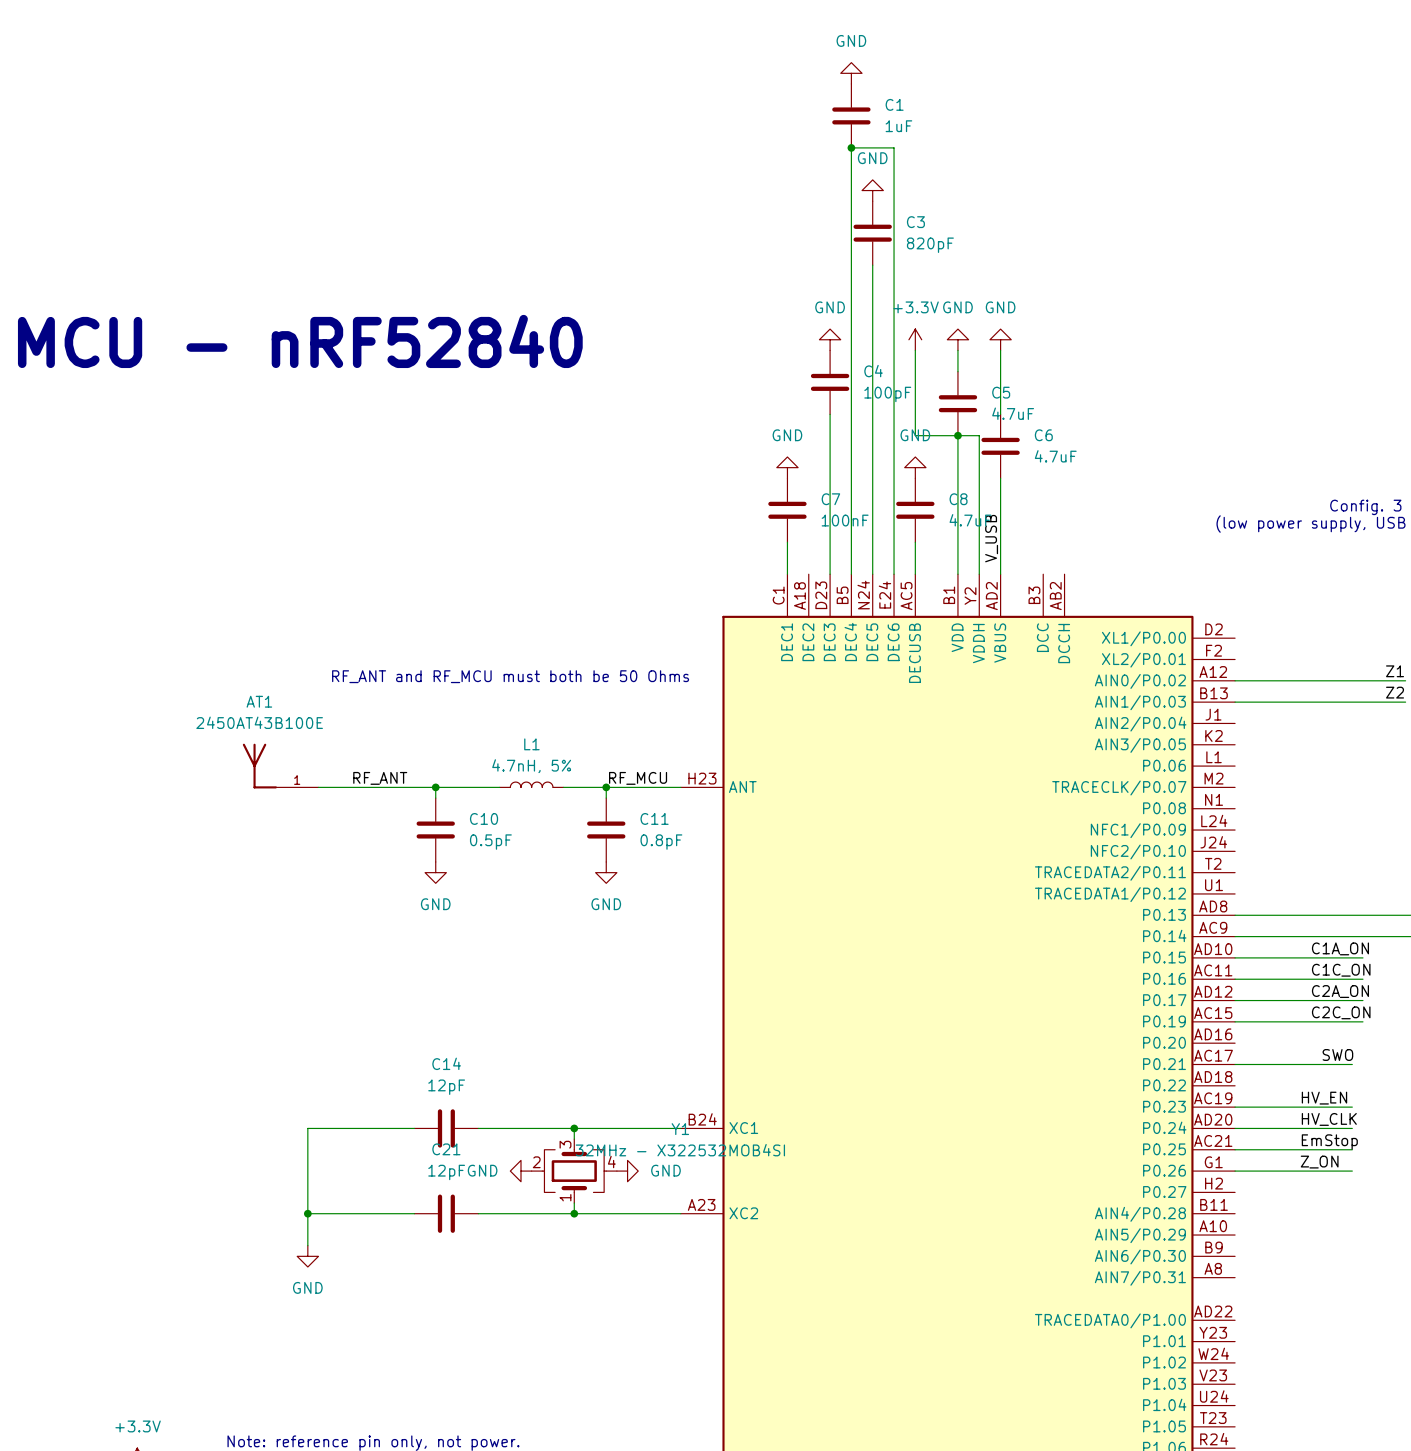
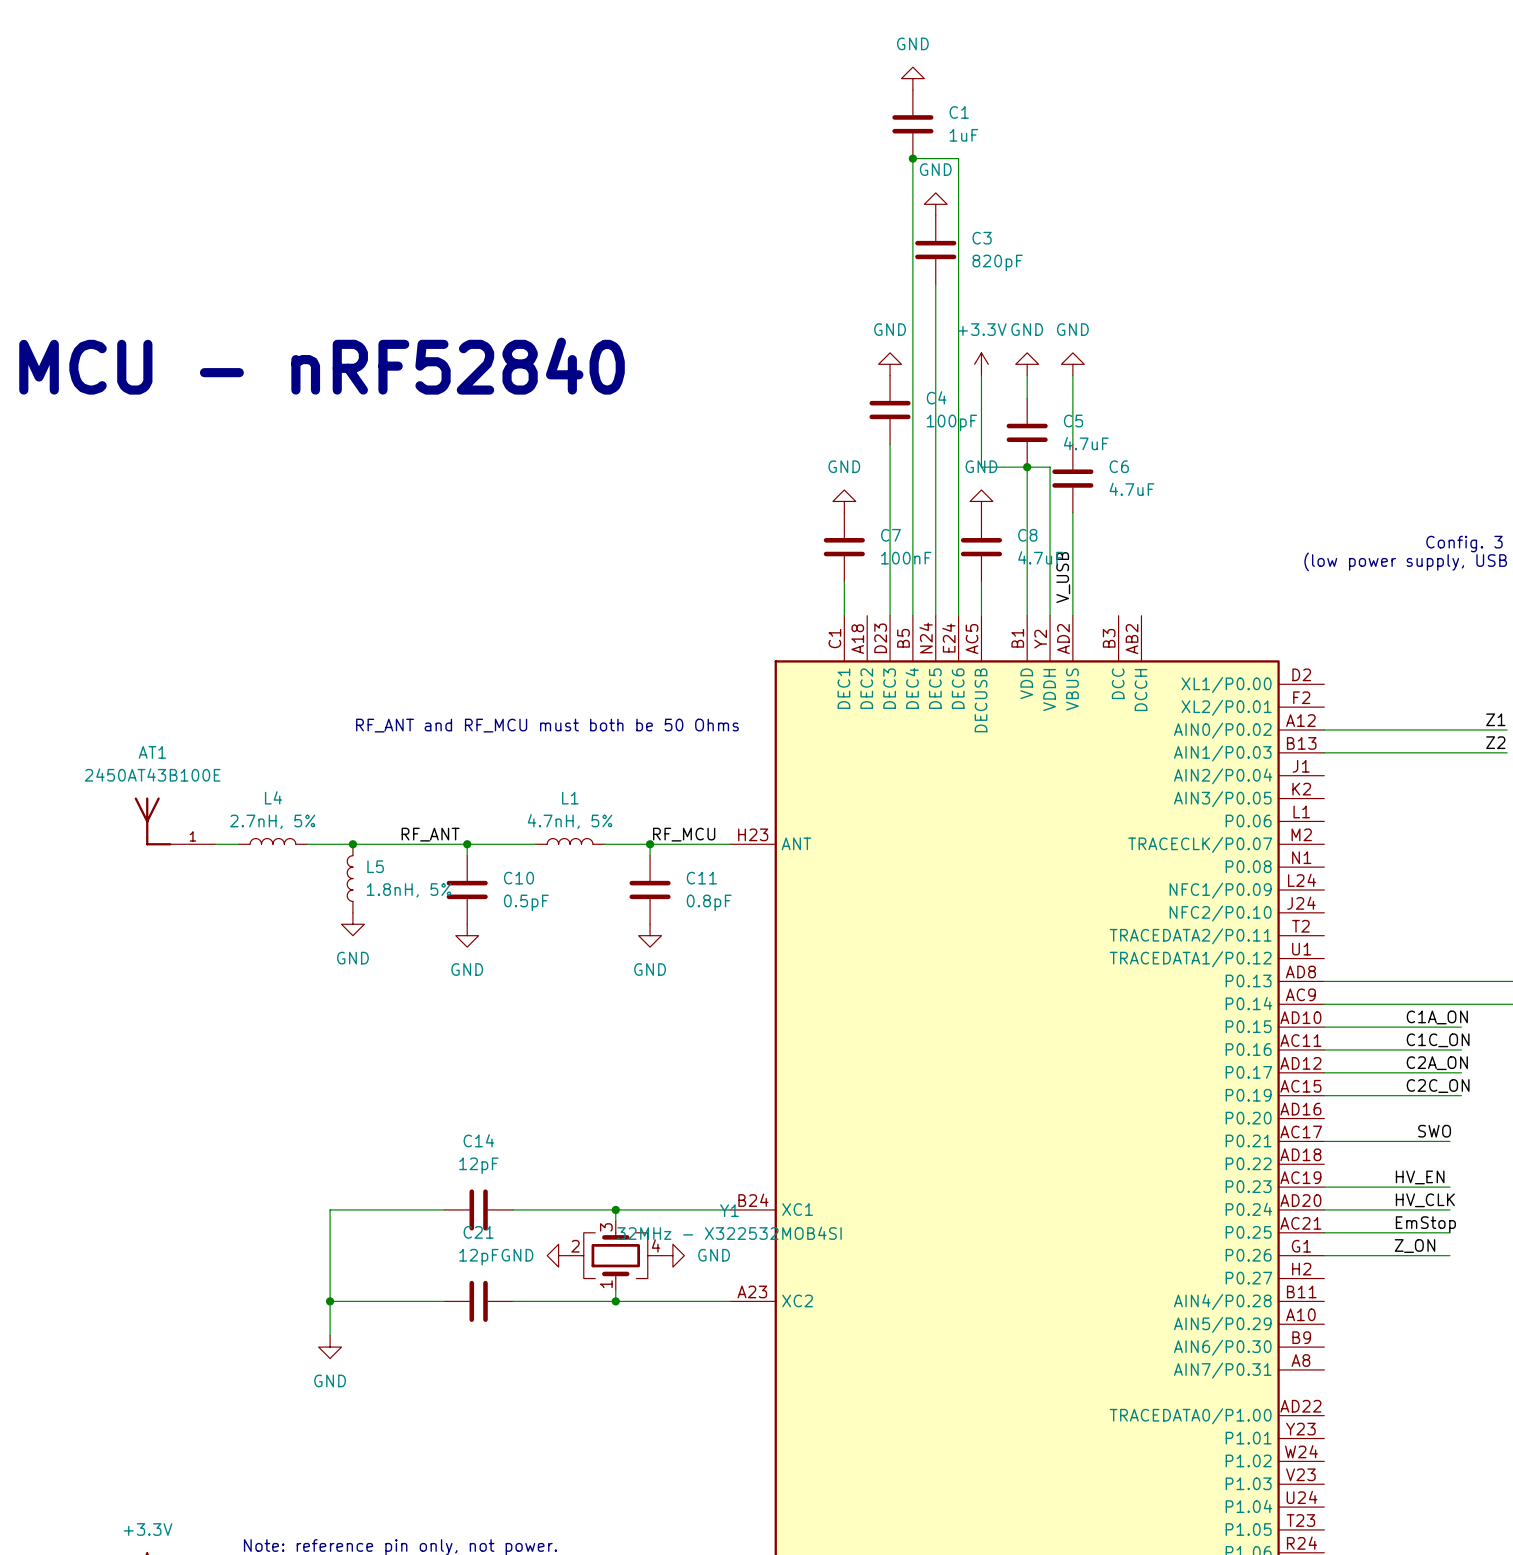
AT1 position: (280, 766) -> (175, 821)
label position: RF_ANT (380, 778) -> RF_ANT (430, 834)
L4: none -> 2.7nH, 5% (272, 841)
wire: none -> (215, 844) (238, 844)
junction: none -> (352, 844)
L5: none -> 1.8nH, 5% (350, 878)
power symbol: none -> GND (352, 924)

